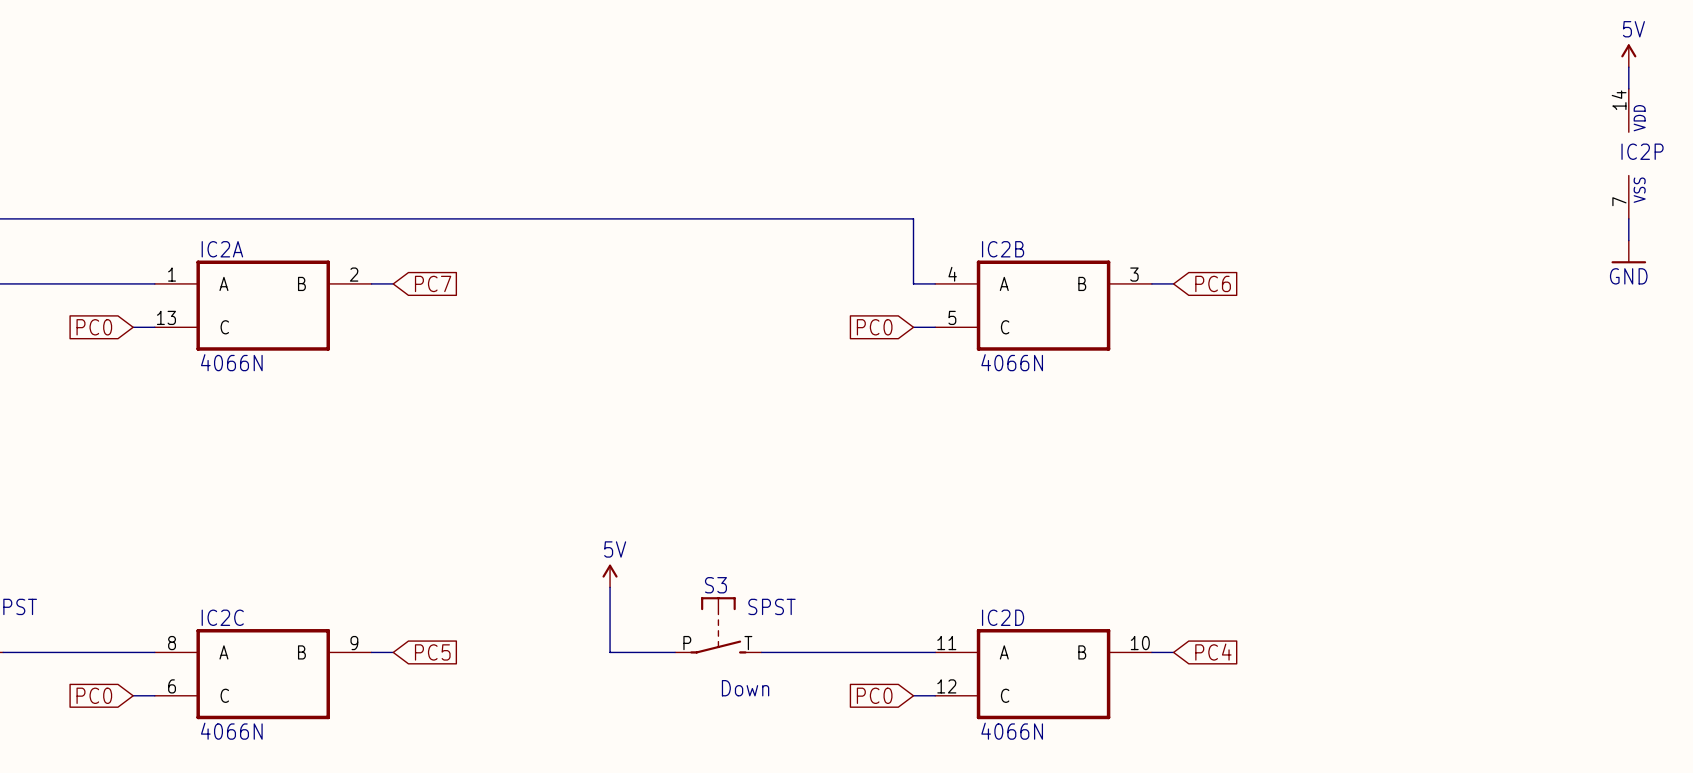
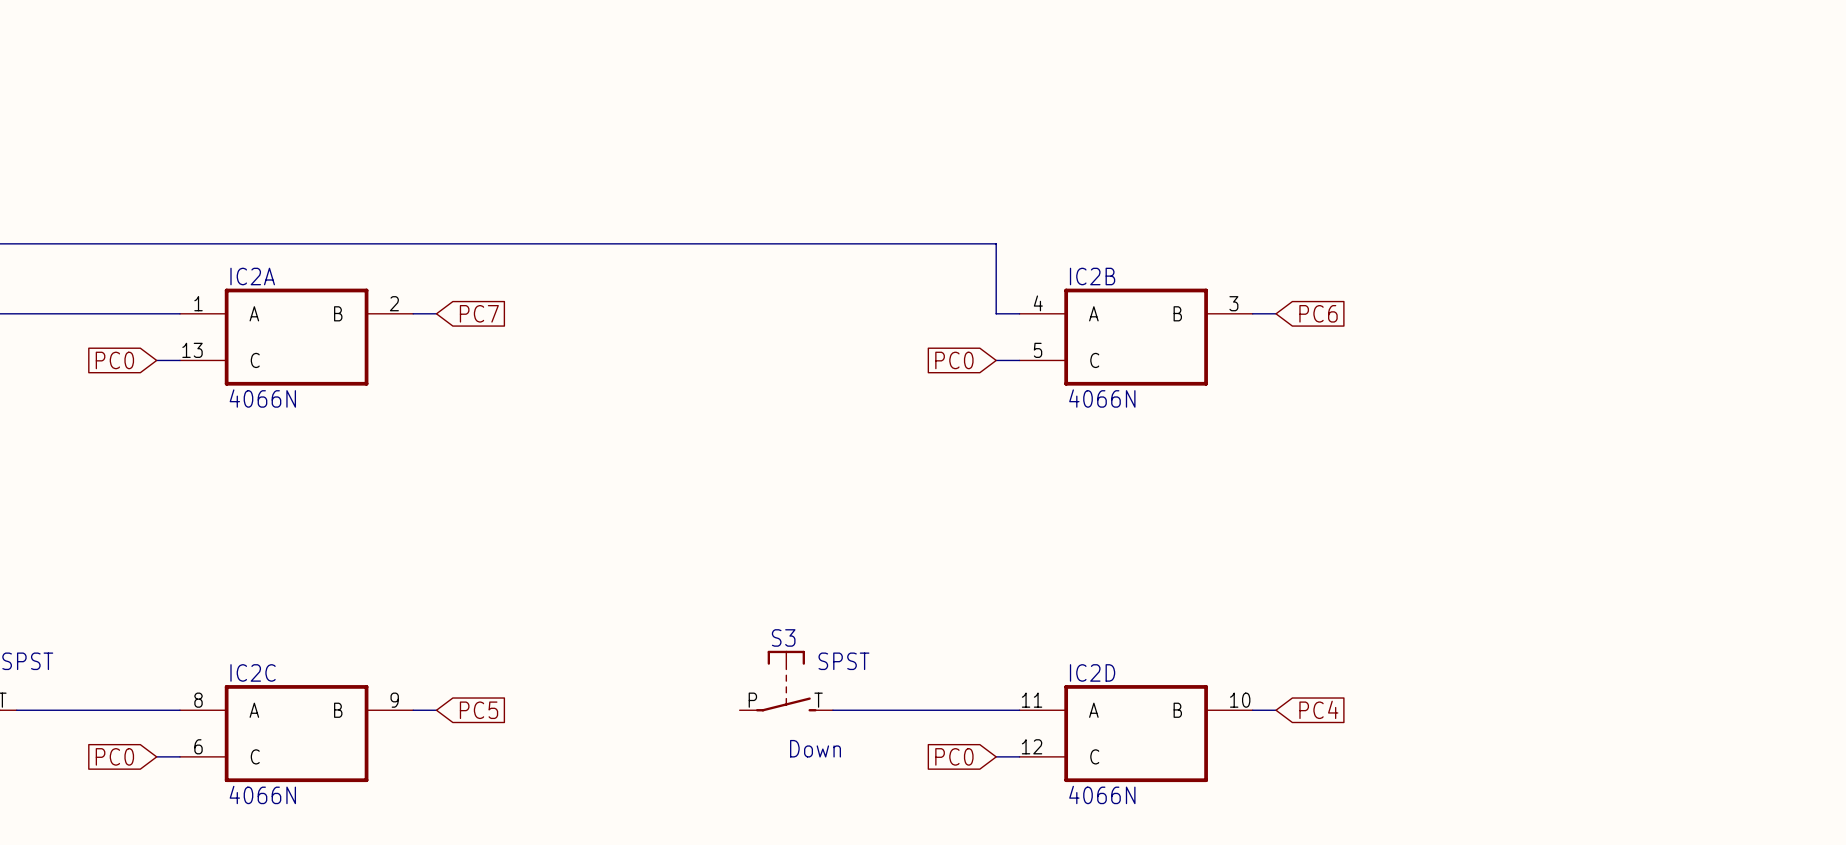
power symbol: 5V (1628, 55) -> none
wire: (1628, 67) (1628, 88) -> none
IC2P: (1628, 153) -> none
wire: (1628, 218) (1628, 240) -> none
power symbol: GND (1628, 251) -> none
power symbol: 5V (610, 576) -> none
wire: (610, 587) (610, 652) (675, 652) -> none

